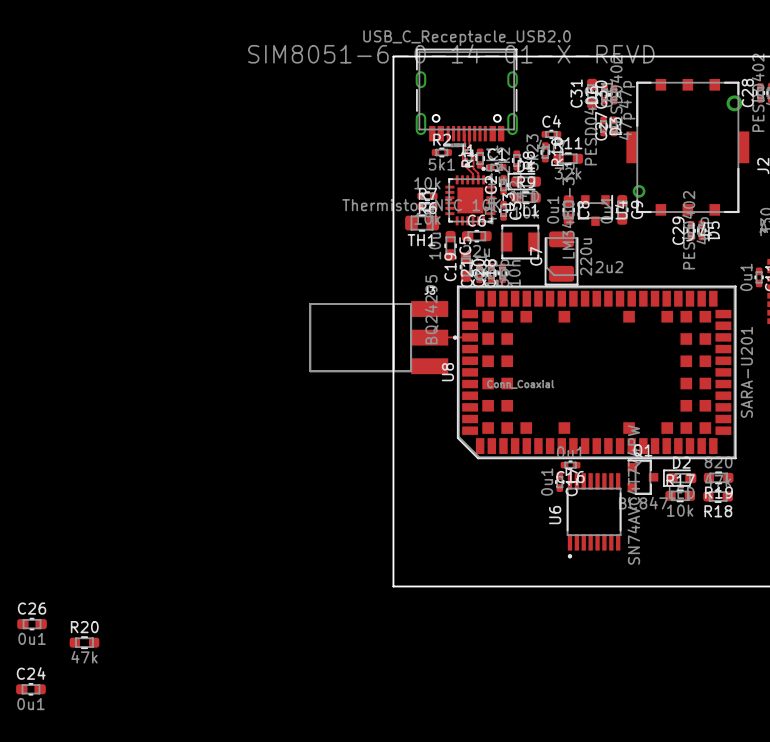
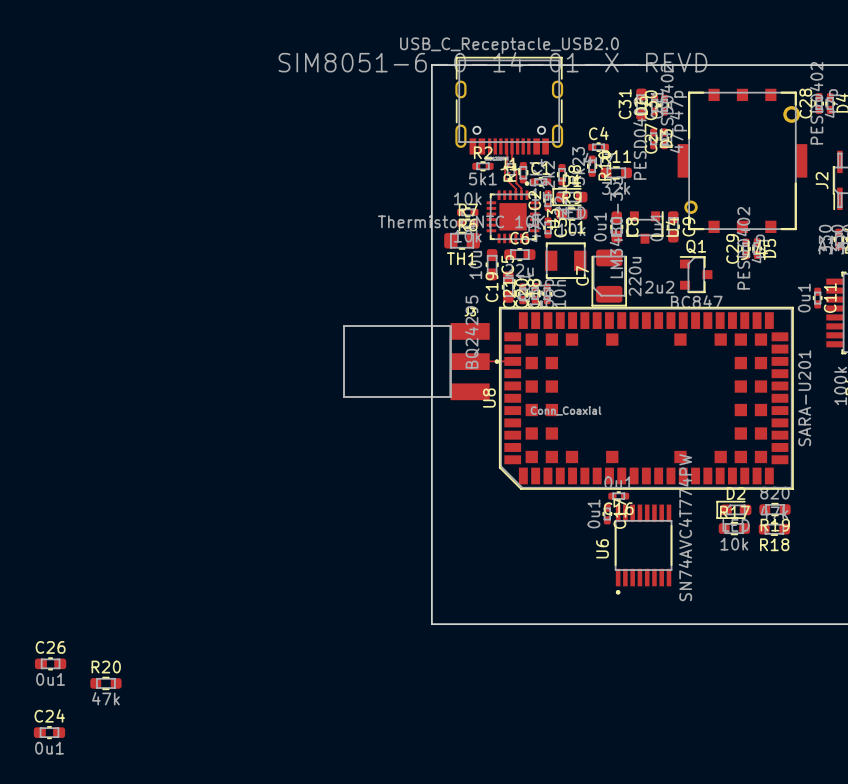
Q1 position: (642, 477) -> (696, 274)

